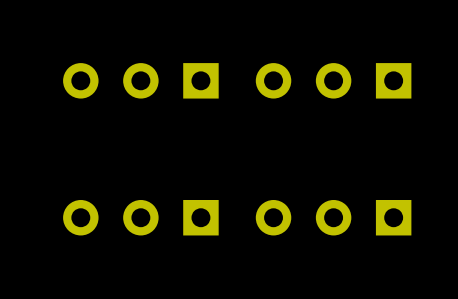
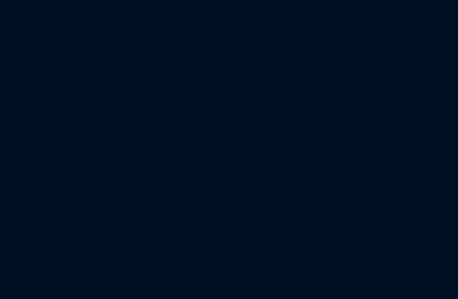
part: (140, 80) -> none
part: (333, 80) -> none
part: (140, 217) -> none
part: (333, 217) -> none

